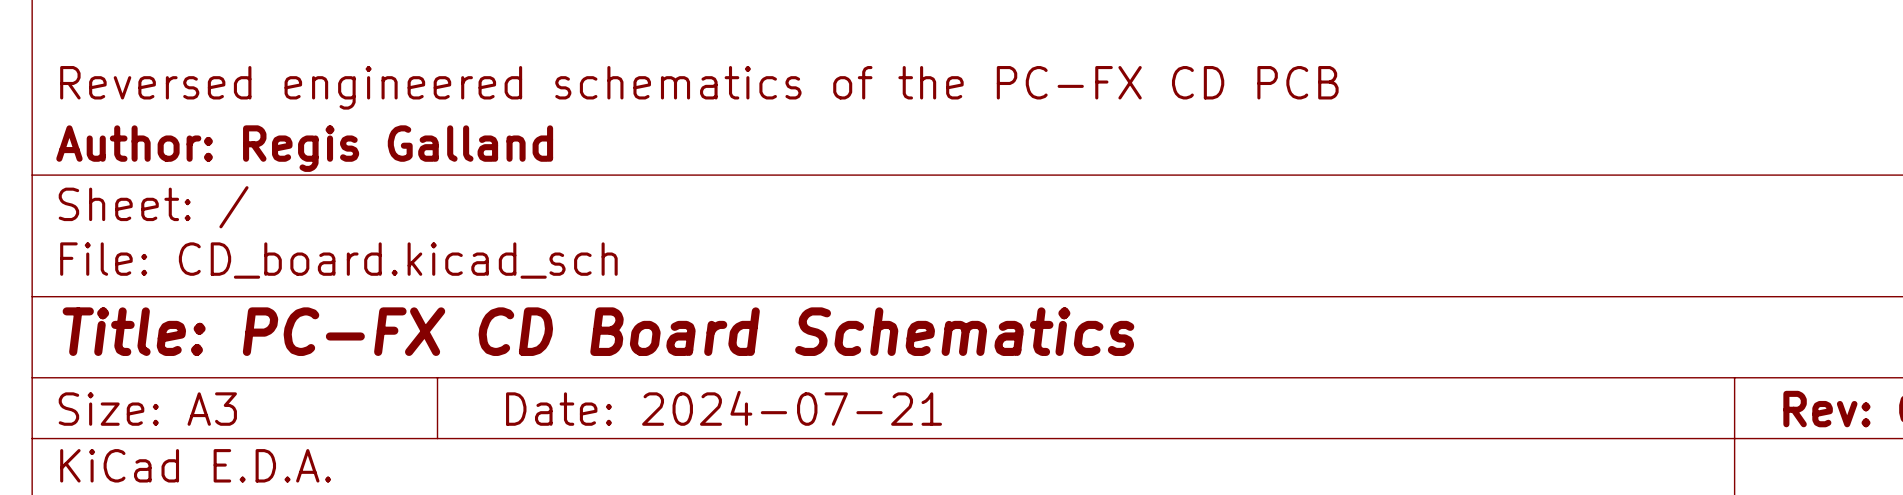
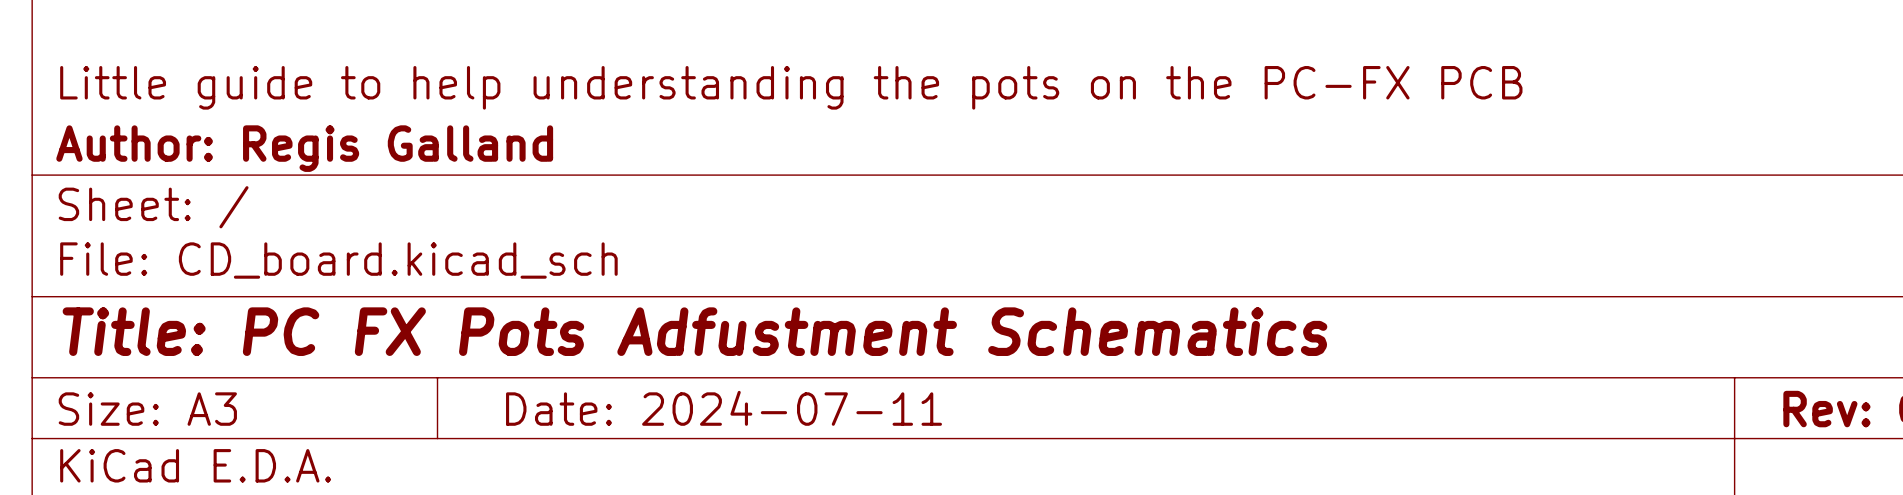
title block: Reversed engineered schematics of the PC-FX CD PCB (699, 87) -> Little guide to help understanding the pots on the PC-FX PCB (791, 87)
title block: Title: PC-FX CD Board Schematics (598, 331) -> Title: PC FX Pots Adfustment Schematics (694, 331)
title block: Date: 2024-07-21 (724, 408) -> Date: 2024-07-11 (724, 408)

